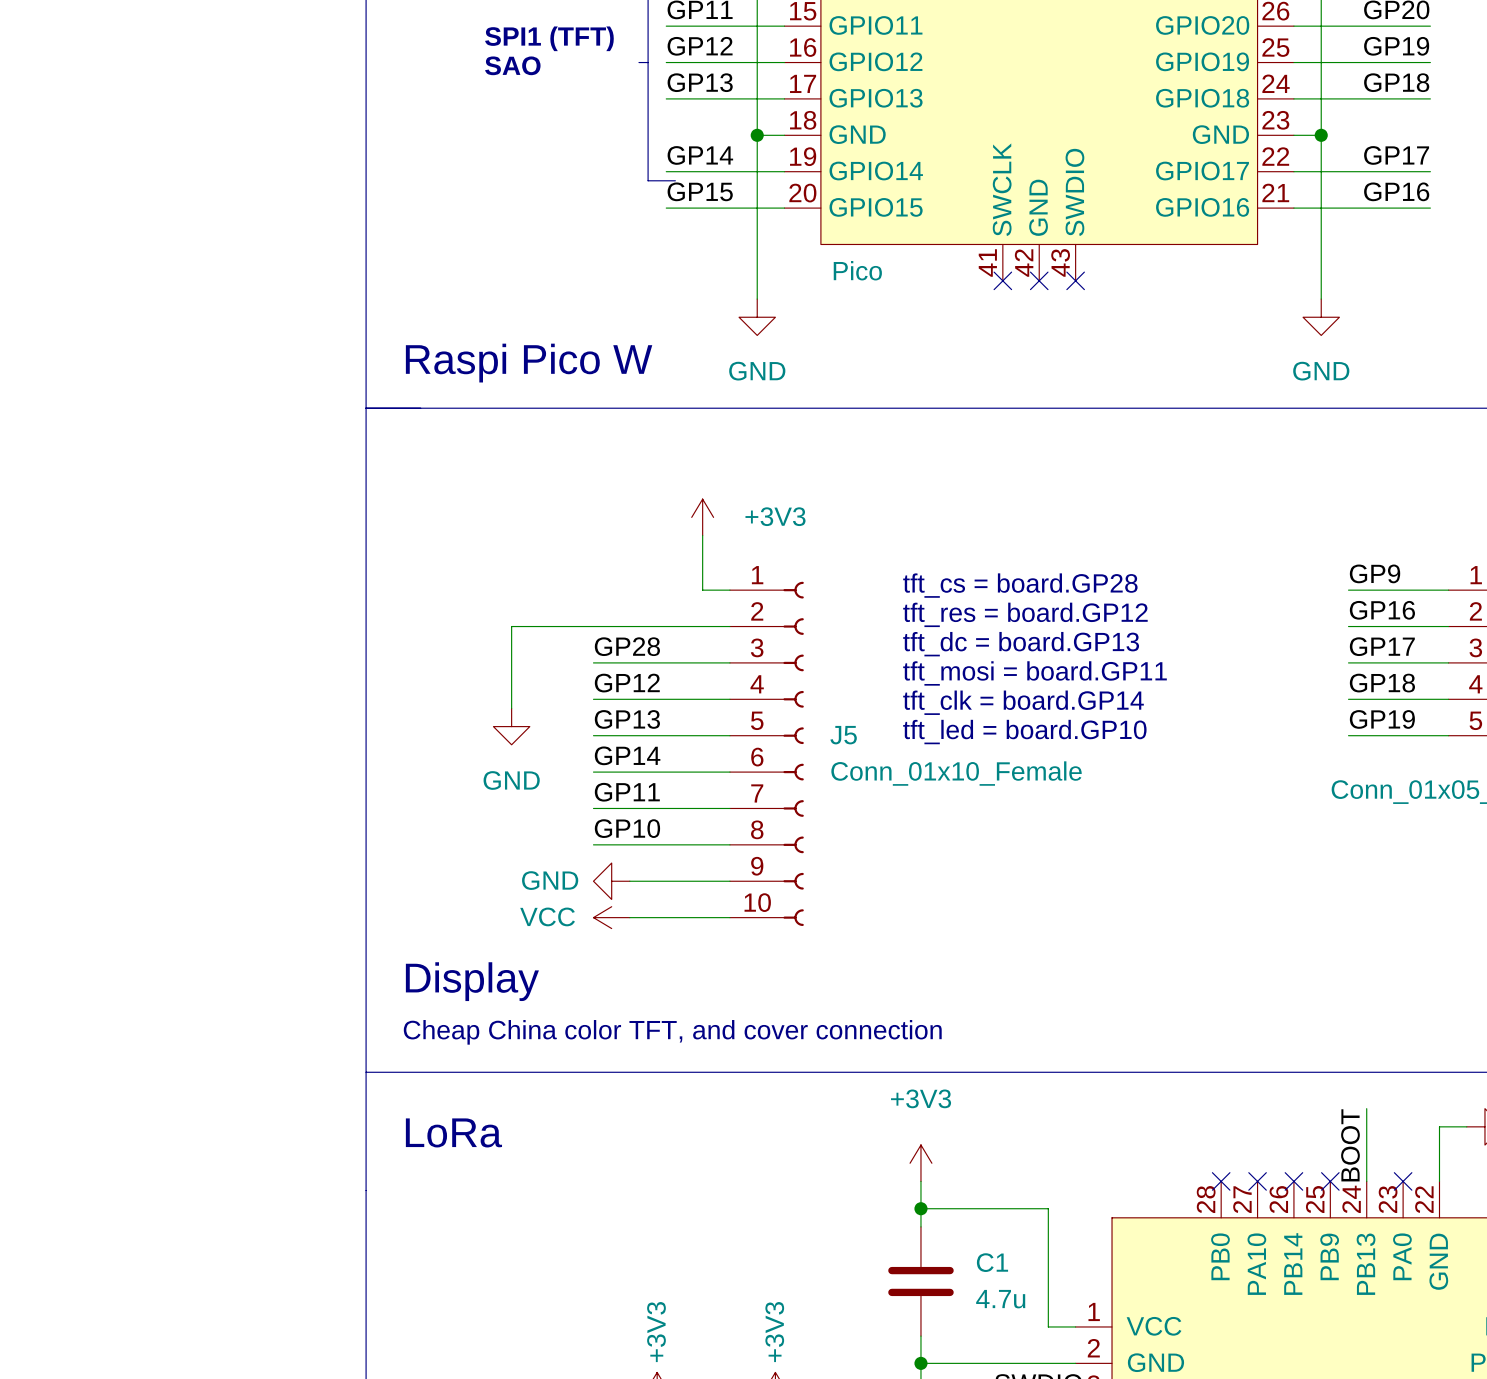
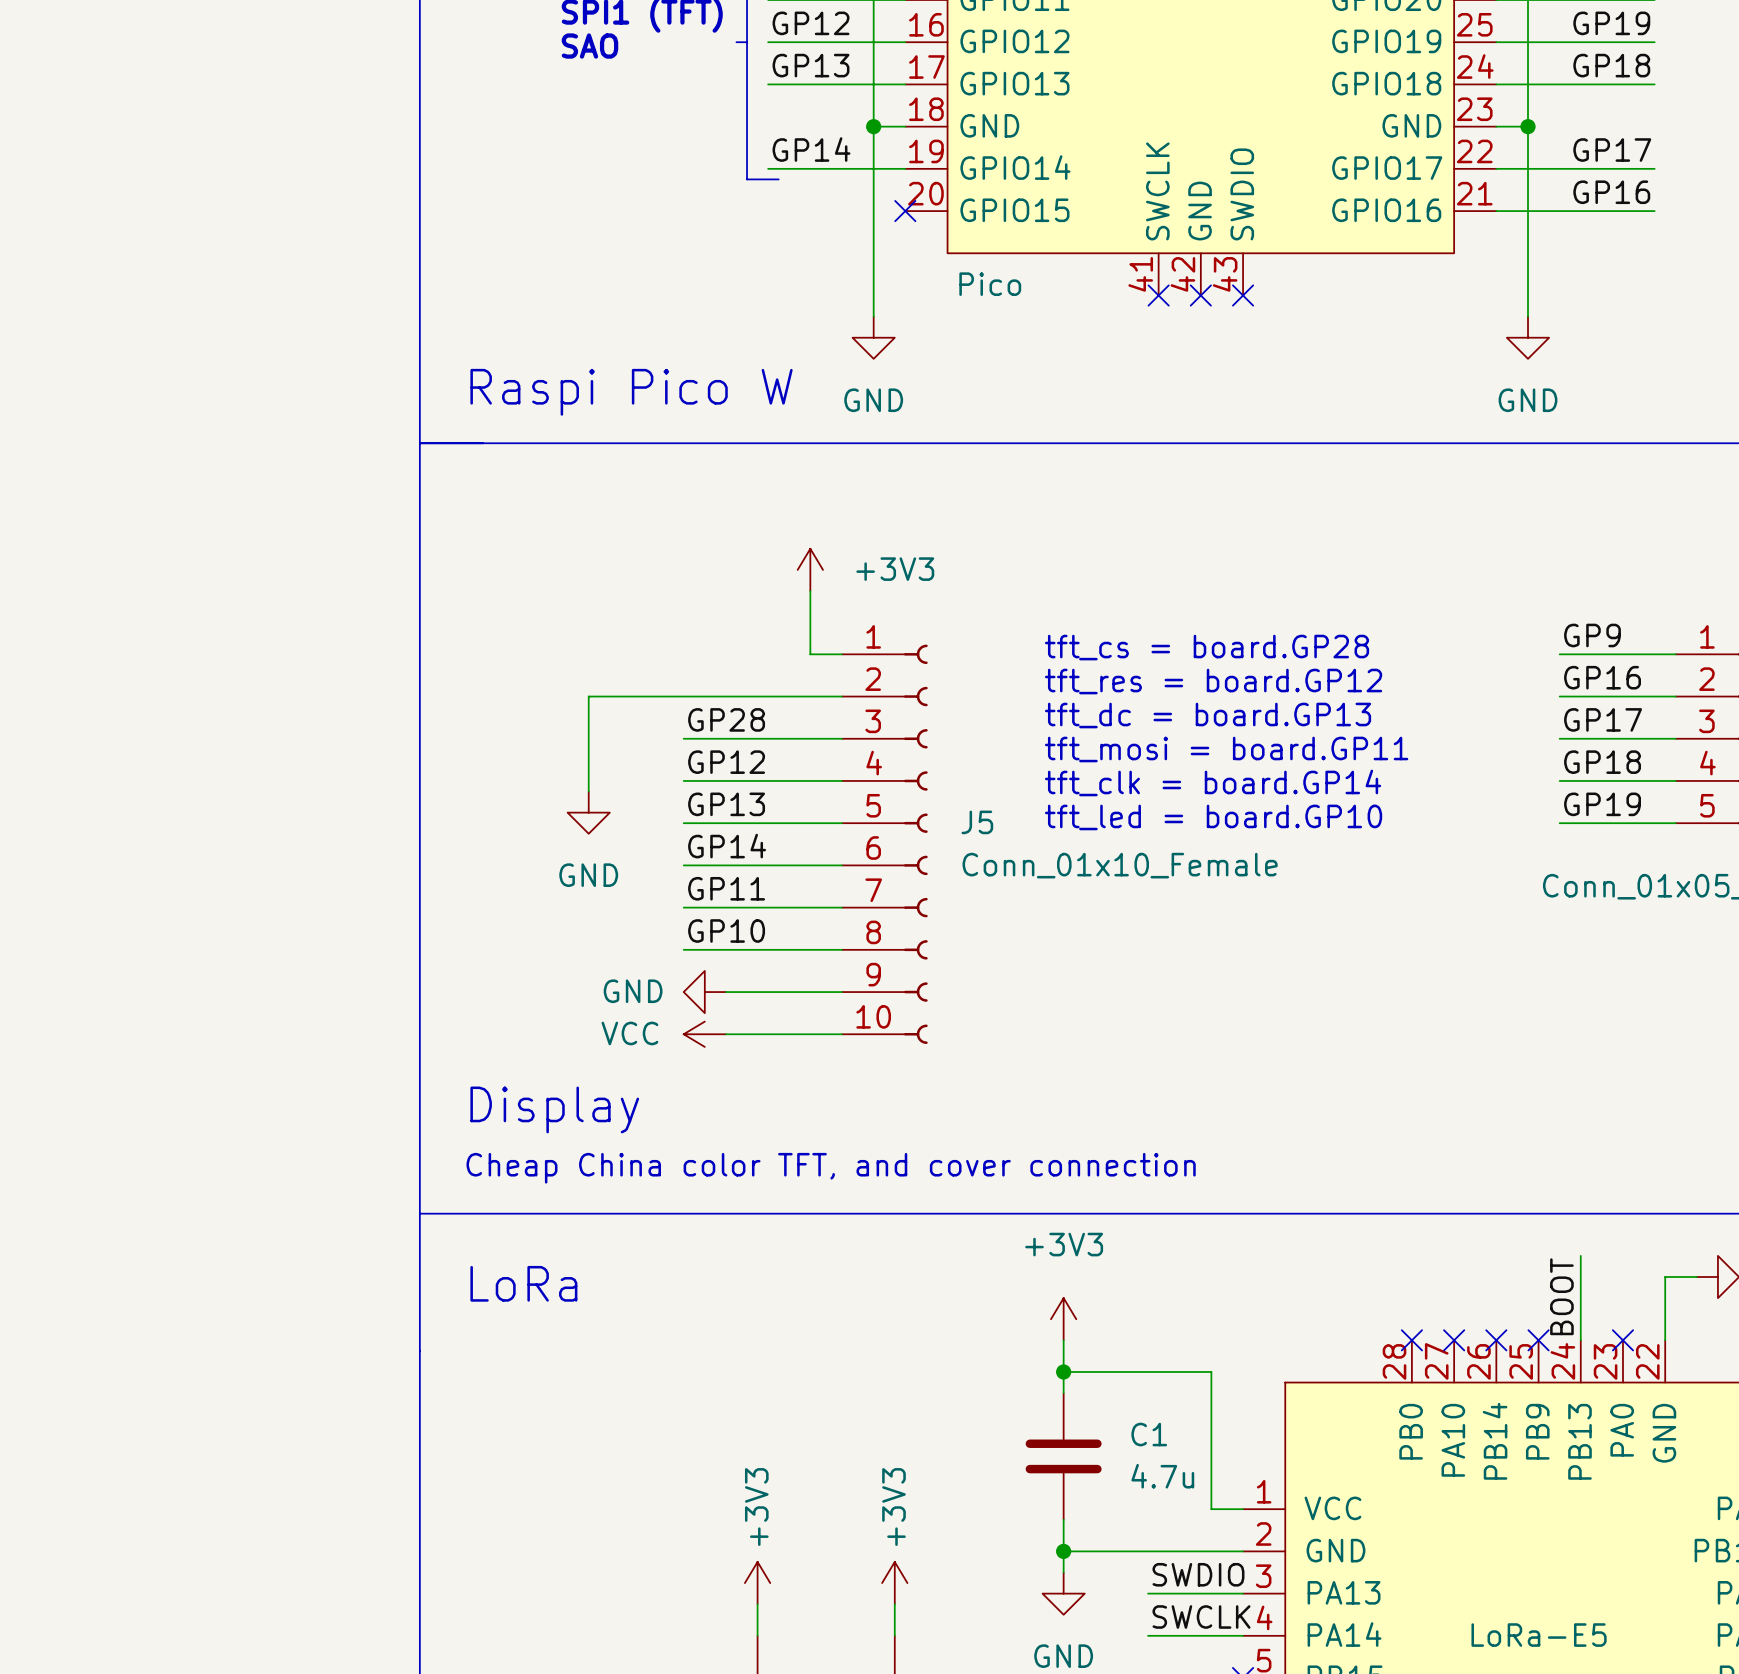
label: GP15 (700, 191) -> none
wire: (666, 208) (784, 208) -> none
no-connect mark: none -> (905, 211)

